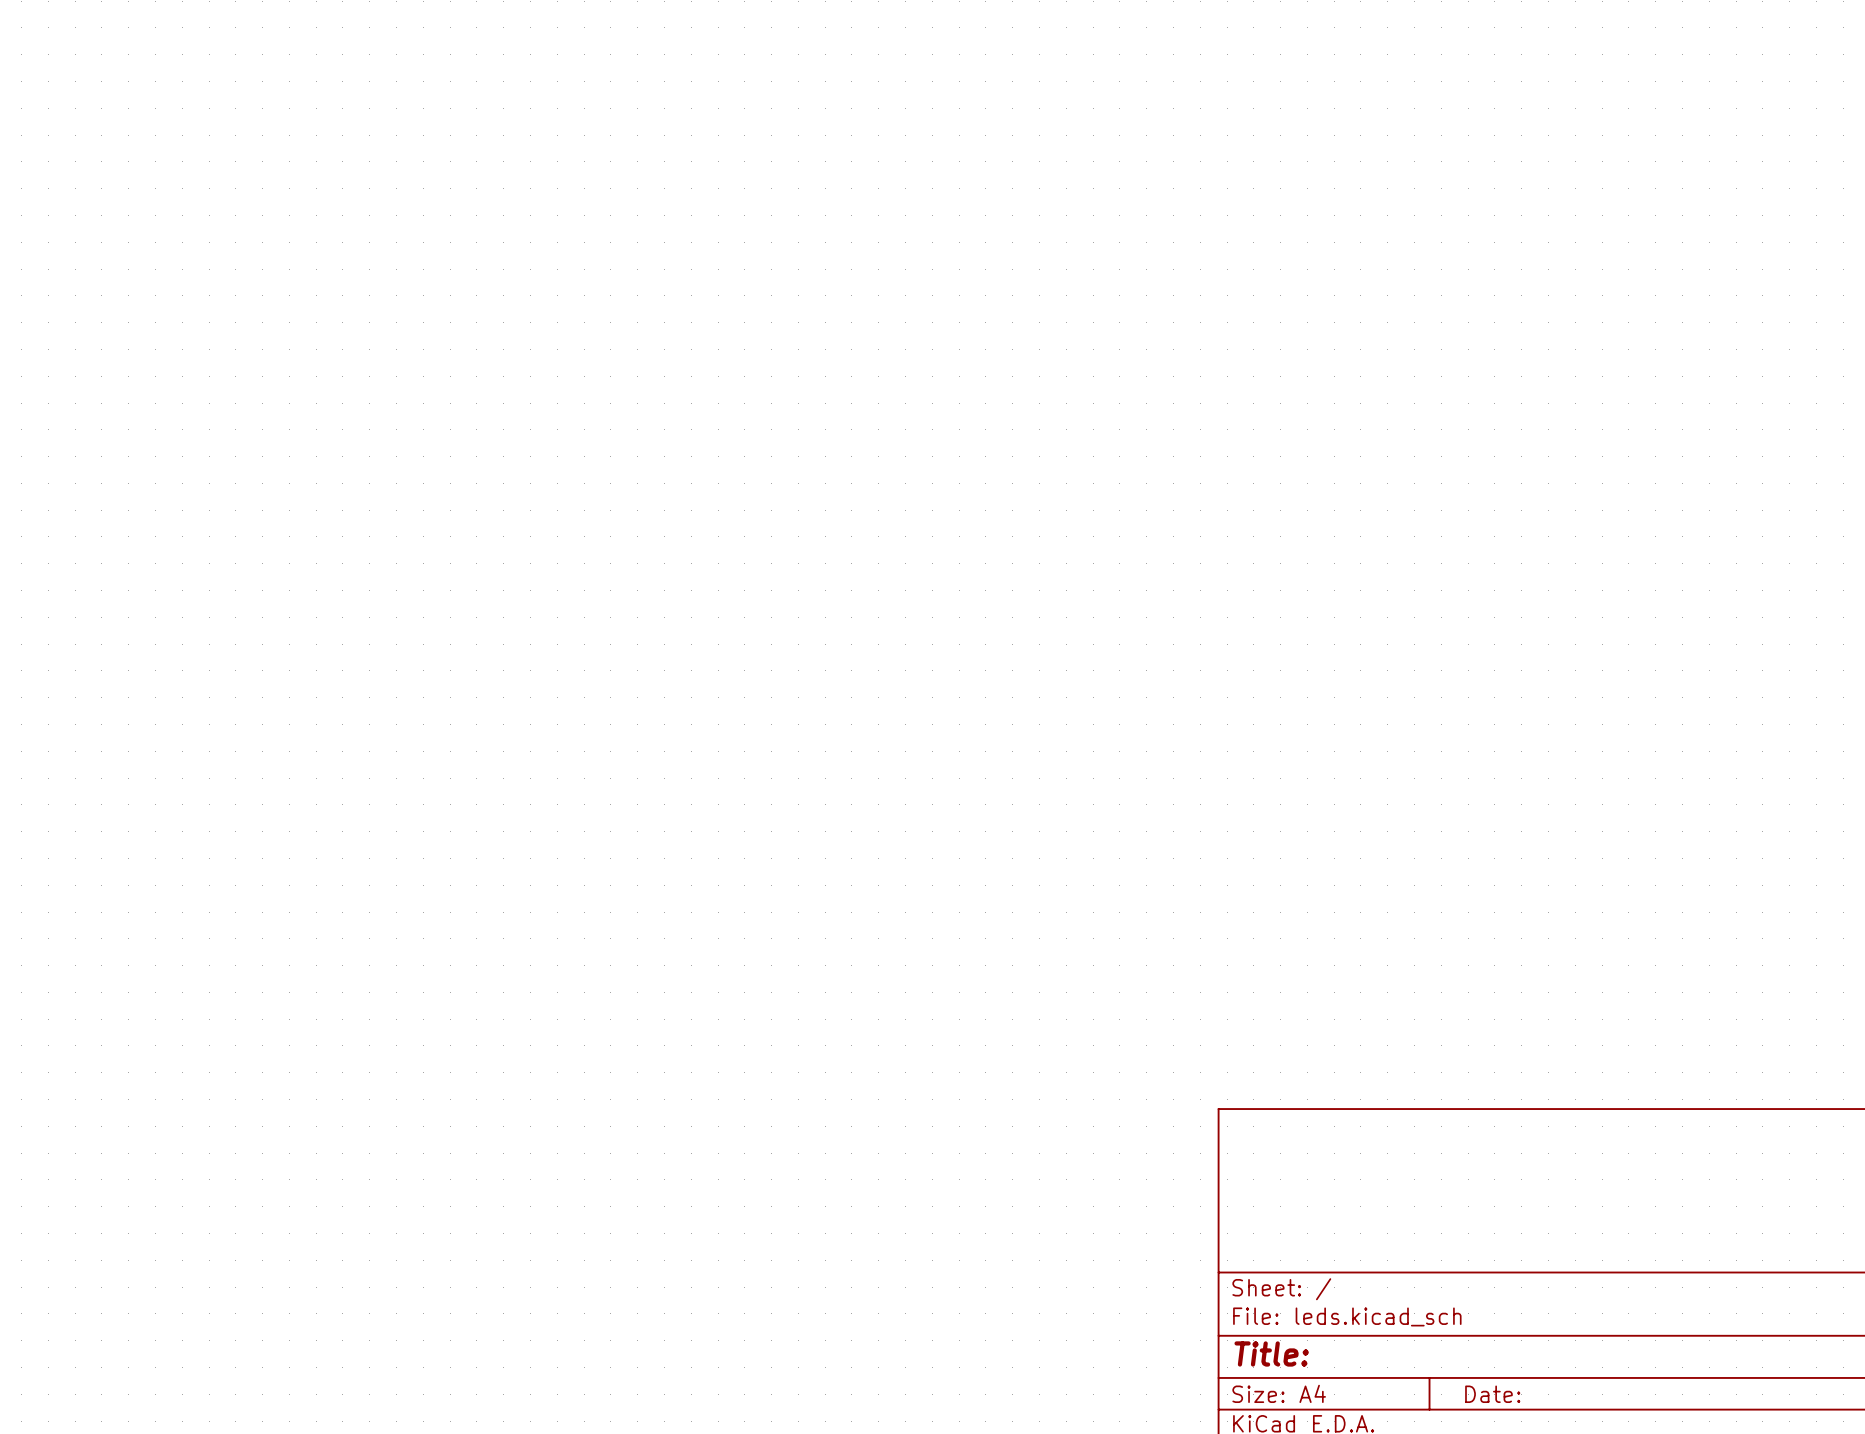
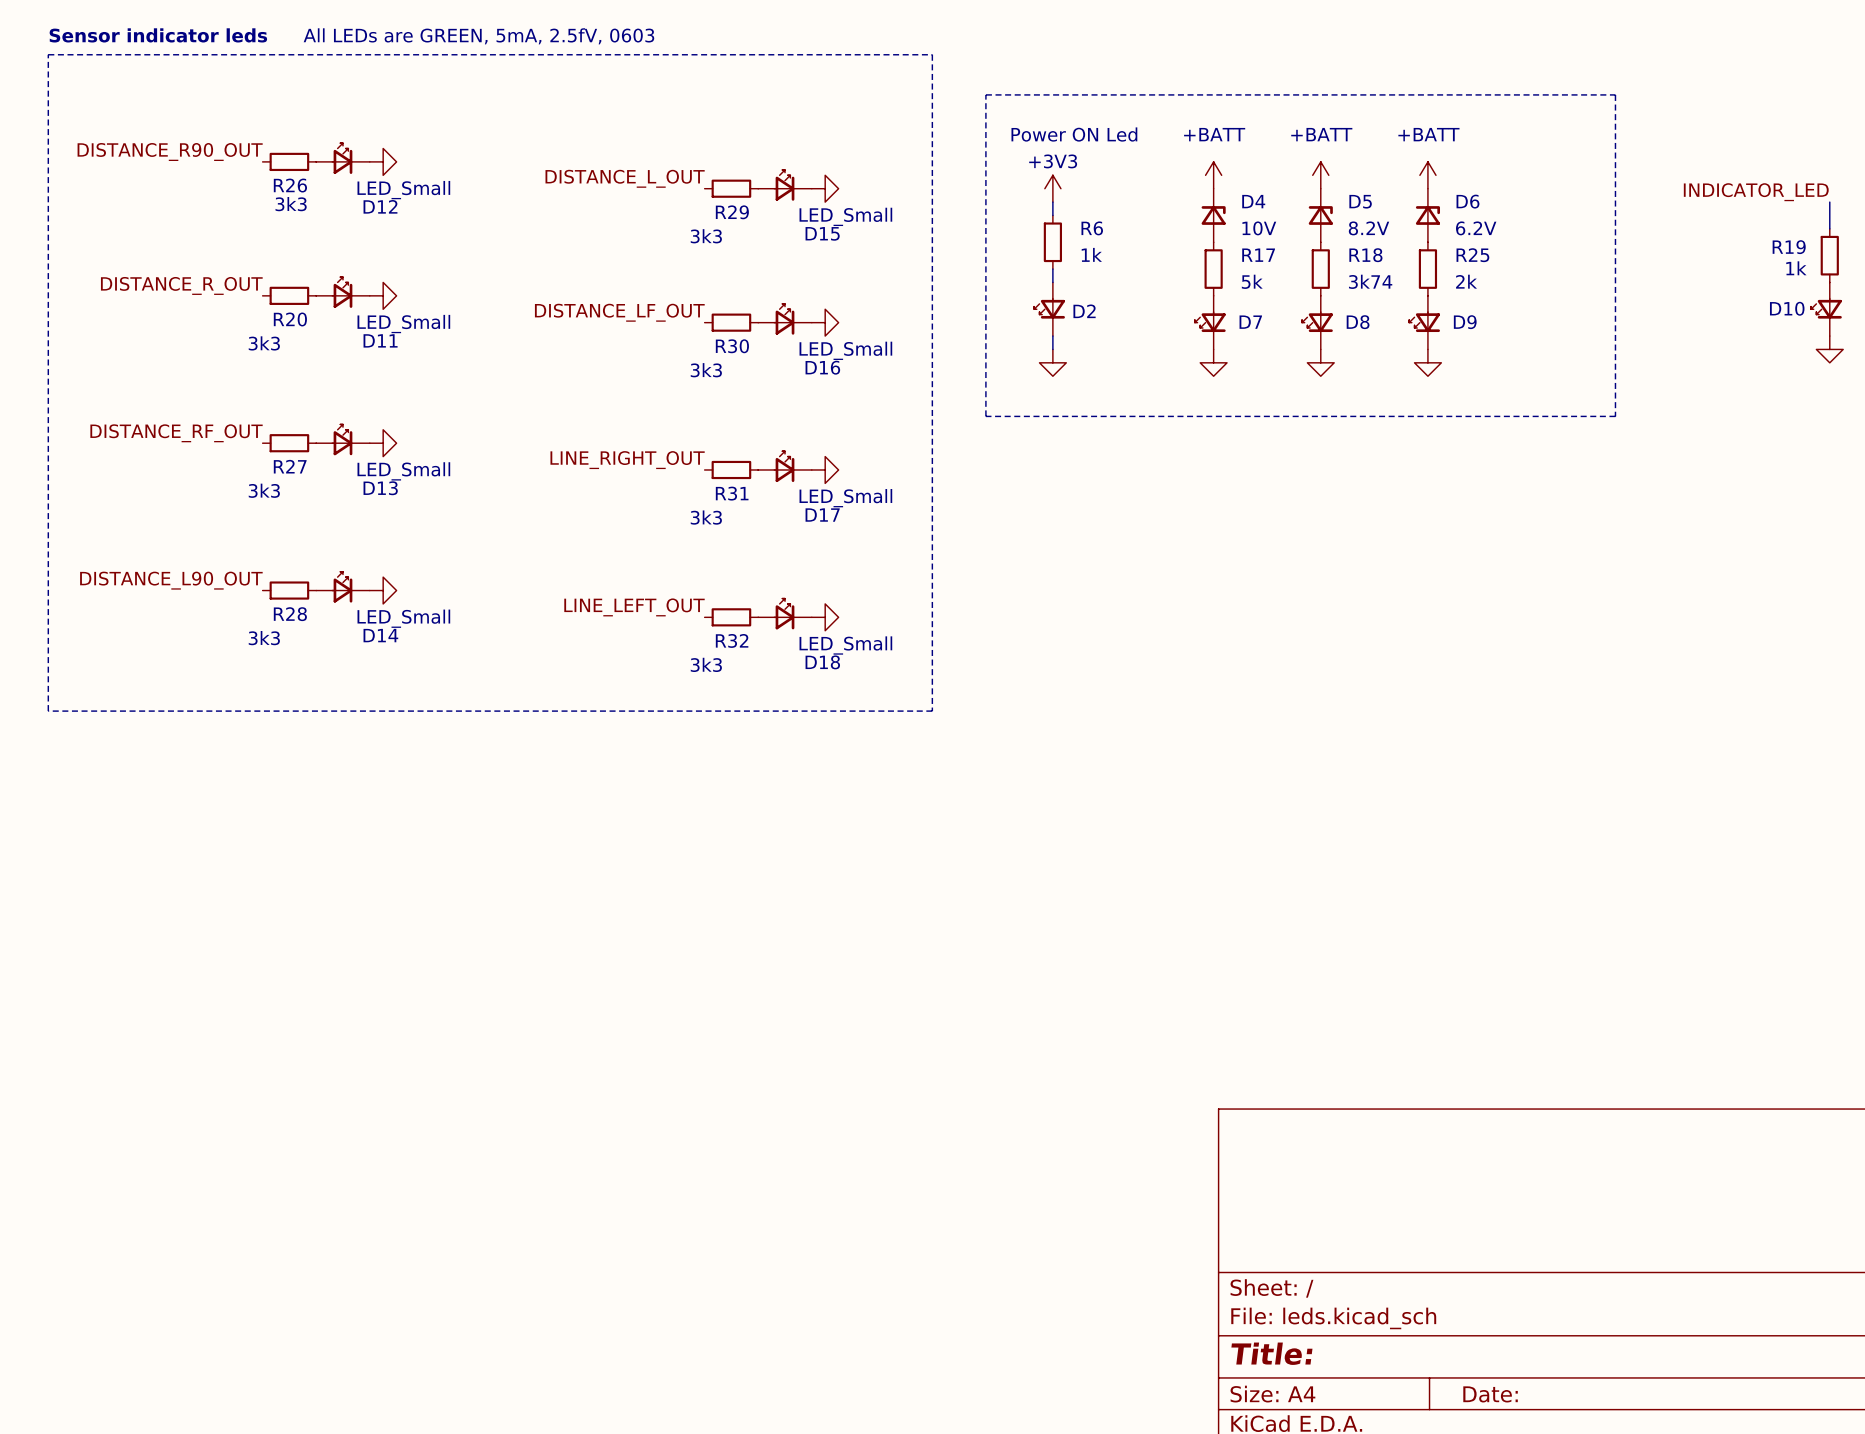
text: none -> Sensor indicator leds (158, 35)
text: none -> All LEDs are GREEN, 5mA, 2.5fV, 0603 (478, 36)
line: none -> (48, 54) (932, 54) (932, 711) (48, 711) (48, 54)
line: none -> (985, 94) (1615, 94) (1615, 416) (985, 416) (985, 94)
text: none -> Power ON Led (1074, 134)
label: none -> DISTANCE_R90_OUT (170, 152)
D12: none -> LED_Small (342, 158)
R26: none -> 3k3 (289, 161)
power symbol: none -> (383, 161)
power symbol: none -> +BATT (1213, 175)
power symbol: none -> +BATT (1320, 175)
power symbol: none -> +BATT (1427, 175)
label: none -> DISTANCE_L_OUT (625, 178)
D15: none -> LED_Small (785, 185)
R29: none -> 3k3 (731, 188)
power symbol: none -> (825, 188)
power symbol: none -> +3V3 (1052, 188)
label: none -> INDICATOR_LED (1756, 192)
wire: none -> (1052, 202) (1052, 215)
wire: none -> (1829, 202) (1829, 228)
D4: none -> 10V (1213, 215)
D5: none -> 8.2V (1320, 215)
D6: none -> 6.2V (1427, 215)
R6: none -> 1k (1052, 242)
R19: none -> 1k (1829, 255)
wire: none -> (1052, 269) (1052, 282)
R17: none -> 5k (1213, 269)
R18: none -> 3k74 (1320, 269)
R25: none -> 2k (1427, 269)
label: none -> DISTANCE_R_OUT (181, 285)
D11: none -> LED_Small (342, 292)
R20: none -> 3k3 (289, 295)
power symbol: none -> (383, 295)
D2: none -> (1049, 309)
D10: none -> (1826, 309)
label: none -> DISTANCE_LF_OUT (619, 312)
D16: none -> LED_Small (785, 319)
R30: none -> 3k3 (731, 322)
power symbol: none -> (825, 322)
D7: none -> (1210, 322)
D8: none -> (1317, 322)
D9: none -> (1424, 322)
wire: none -> (1052, 336) (1052, 349)
power symbol: none -> (1829, 349)
power symbol: none -> (1052, 362)
power symbol: none -> (1213, 362)
power symbol: none -> (1320, 362)
power symbol: none -> (1427, 362)
label: none -> DISTANCE_RF_OUT (176, 433)
D13: none -> LED_Small (342, 439)
R27: none -> 3k3 (289, 443)
power symbol: none -> (383, 443)
label: none -> LINE_RIGHT_OUT (627, 460)
D17: none -> LED_Small (785, 466)
R31: none -> 3k3 (731, 469)
power symbol: none -> (825, 469)
label: none -> DISTANCE_L90_OUT (171, 580)
D14: none -> LED_Small (342, 587)
R28: none -> 3k3 (289, 590)
power symbol: none -> (383, 590)
label: none -> LINE_LEFT_OUT (634, 607)
D18: none -> LED_Small (785, 613)
R32: none -> 3k3 (731, 617)
power symbol: none -> (825, 617)

